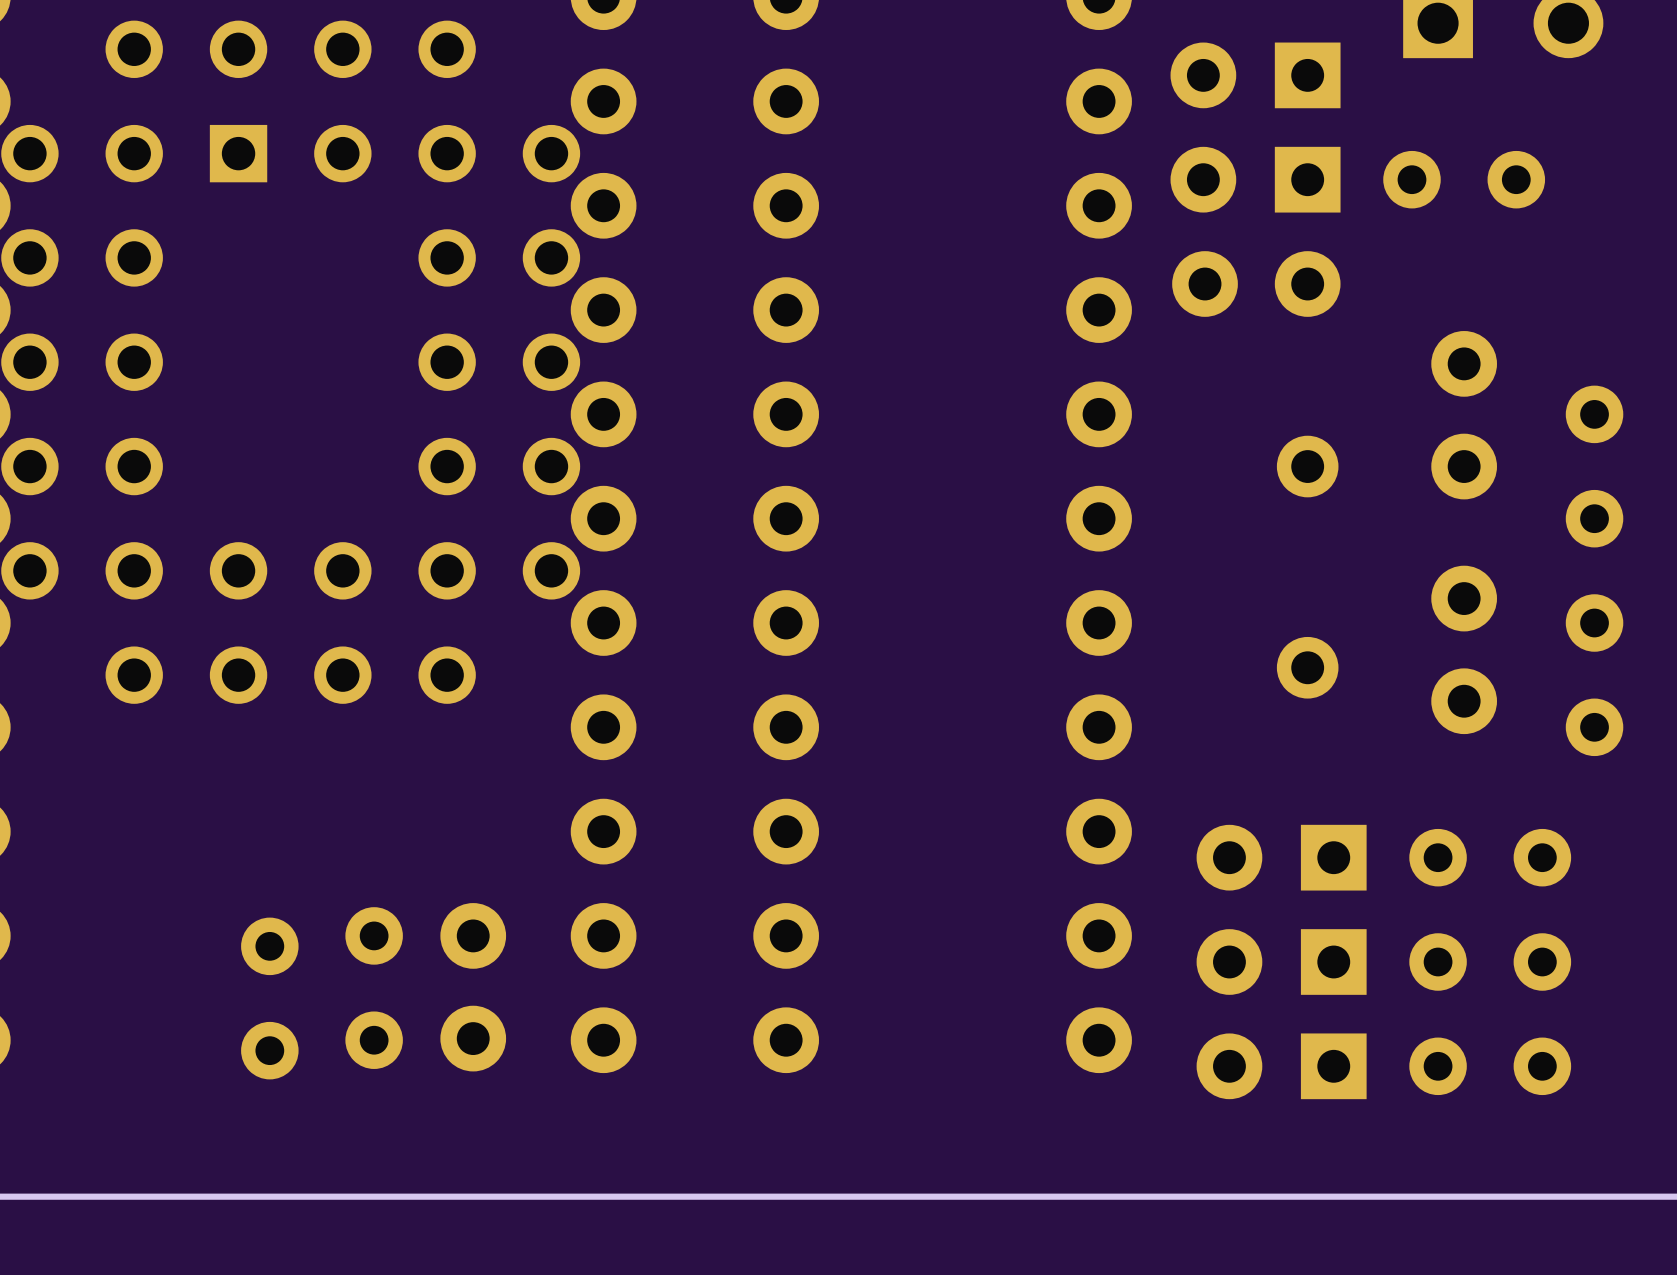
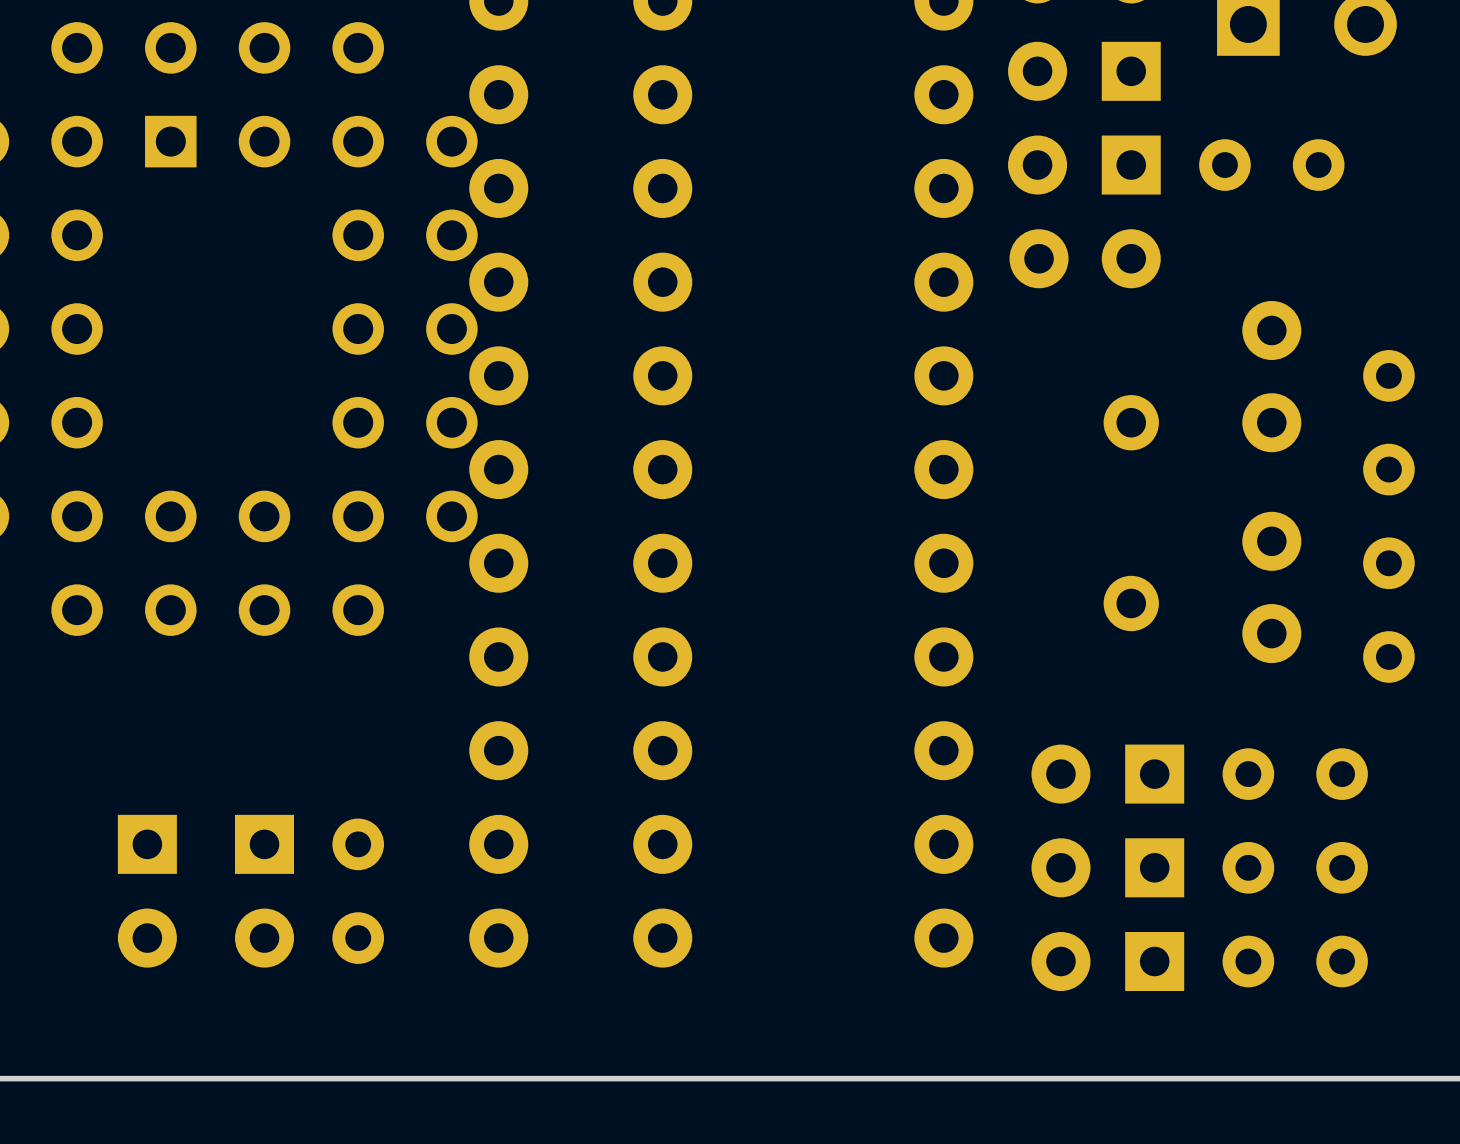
part footprint: [440, 903, 507, 1072] -> [332, 818, 385, 964]
part footprint: [345, 907, 403, 1069] -> [234, 814, 295, 968]
part: none -> (147, 891)
part: (269, 998) -> none

